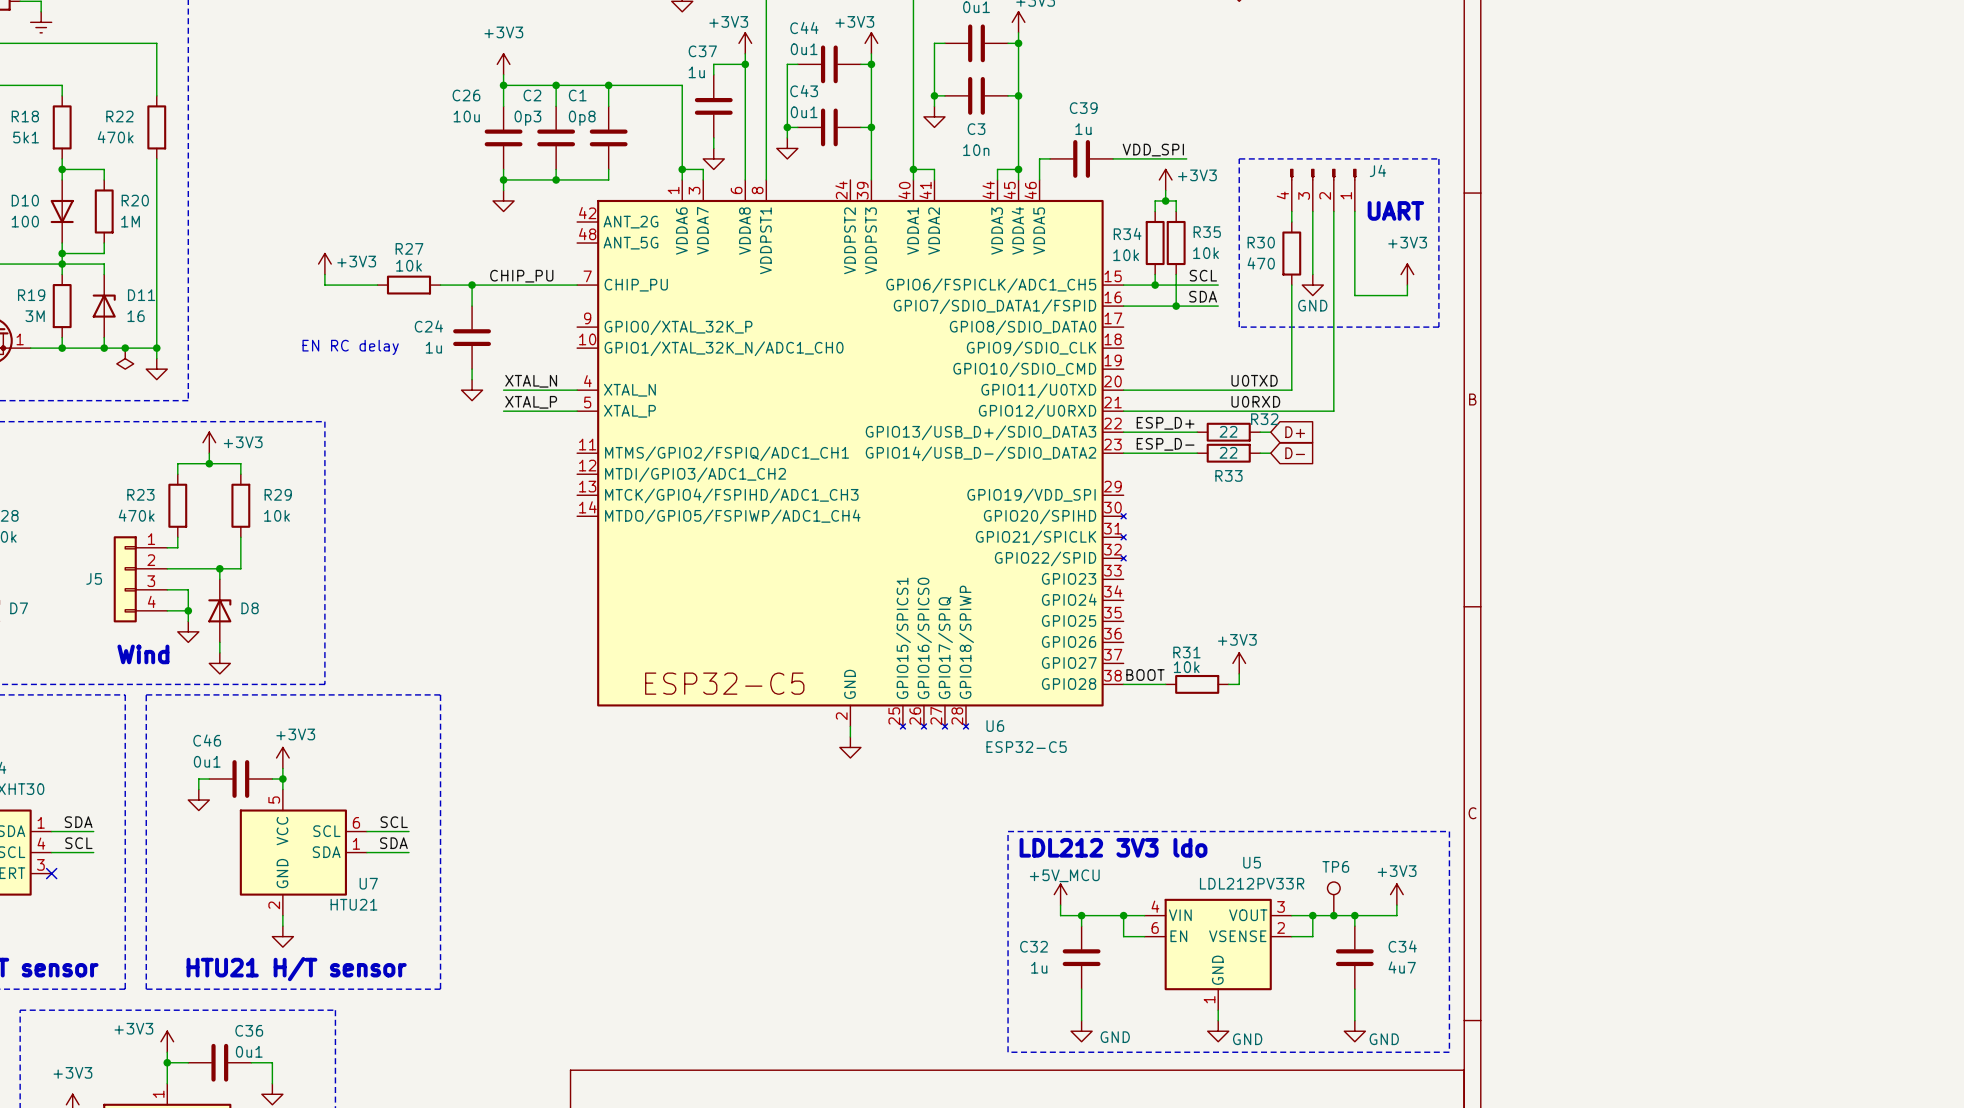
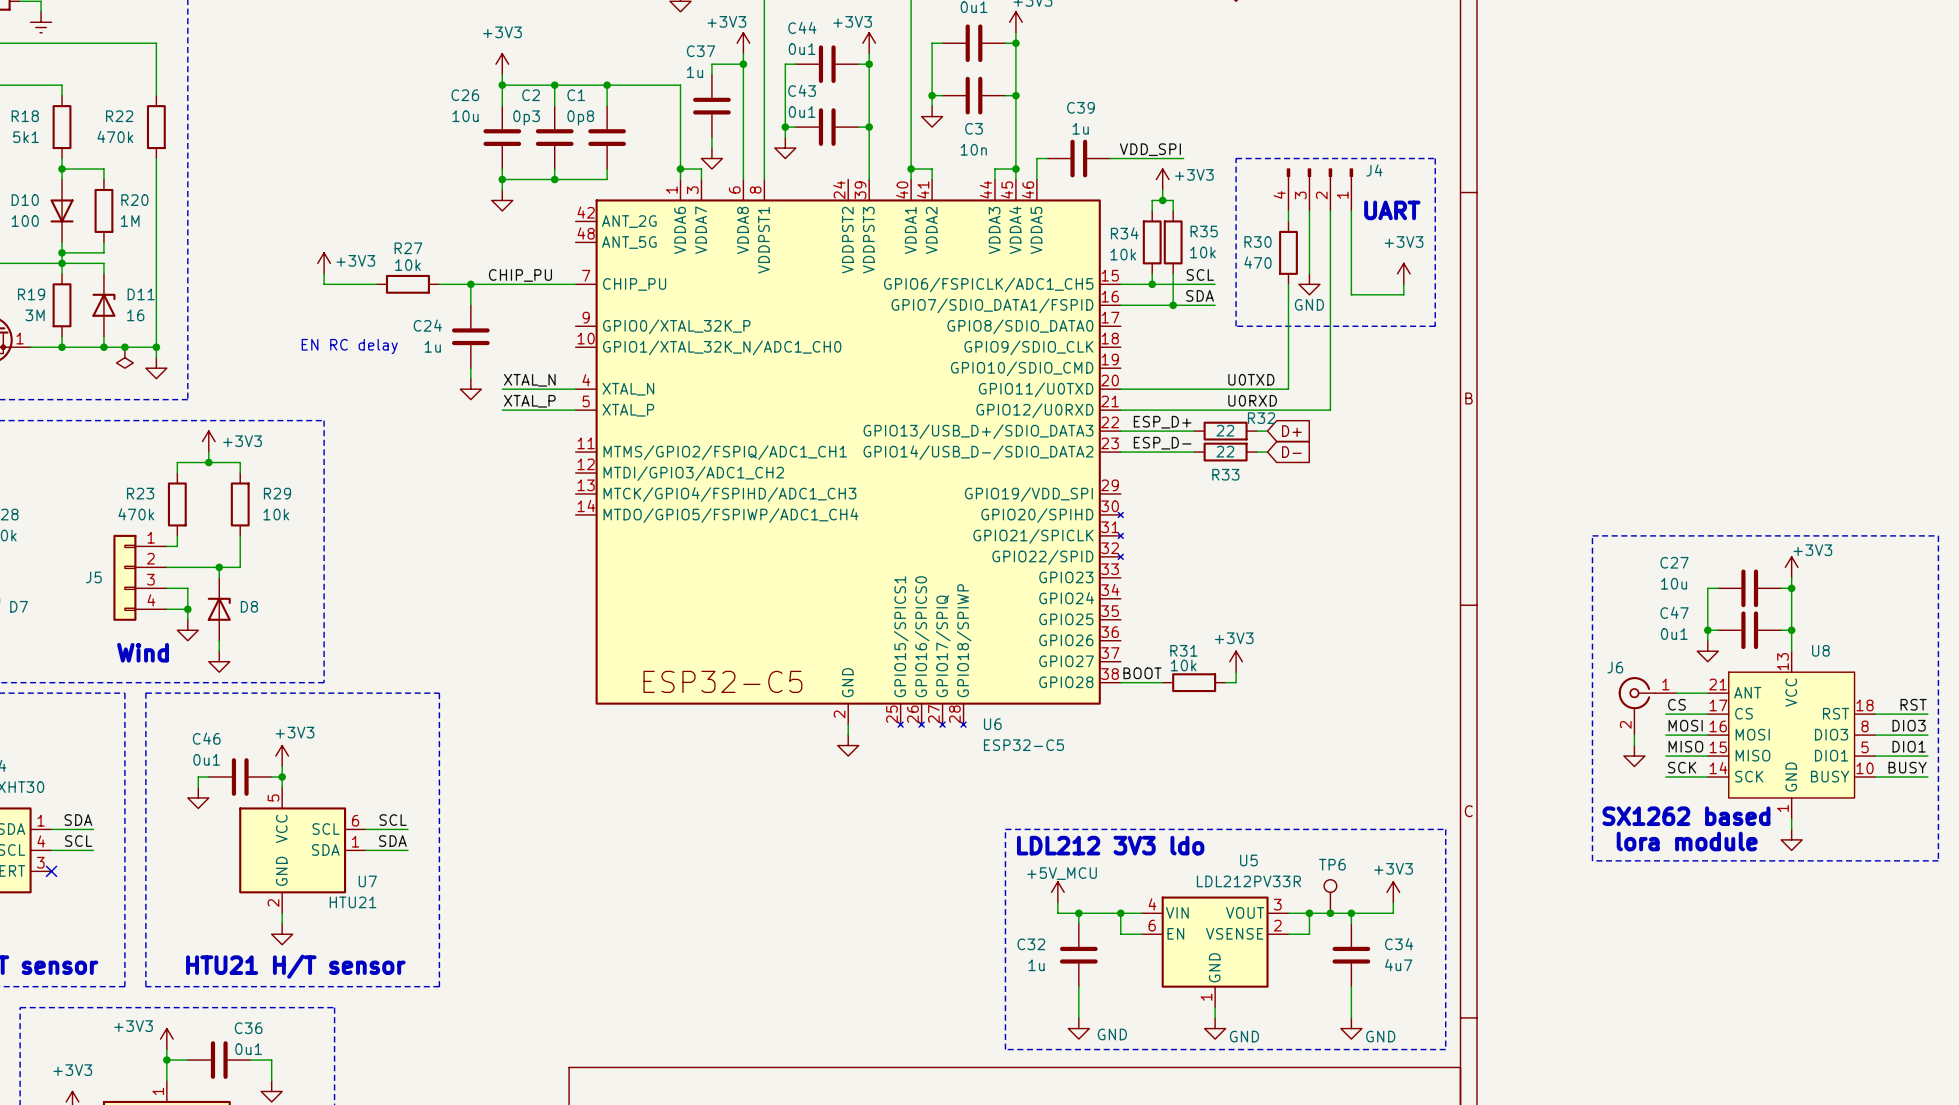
line: none -> (1592, 535) (1938, 535) (1938, 860) (1592, 860) (1592, 535)
power symbol: none -> +3V3 (1791, 567)
wire: none -> (1791, 577) (1791, 651)
wire: none -> (1718, 588) (1707, 588) (1707, 640)
C27: none -> 10u (1749, 588)
wire: none -> (1781, 588) (1791, 588)
junction: none -> (1791, 588)
wire: none -> (1707, 630) (1718, 630)
junction: none -> (1707, 630)
C47: none -> 0u1 (1749, 630)
wire: none -> (1781, 630) (1791, 630)
junction: none -> (1791, 630)
power symbol: none -> (1707, 651)
wire: none -> (1676, 693) (1707, 693)
label: none -> CS (1676, 704)
label: none -> RST (1913, 704)
J6: none -> (1647, 706)
wire: none -> (1665, 714) (1707, 714)
wire: none -> (1875, 714) (1927, 714)
label: none -> MOSI (1685, 725)
label: none -> DIO3 (1909, 725)
wire: none -> (1634, 735) (1634, 745)
wire: none -> (1665, 735) (1707, 735)
U8: none -> (1791, 735)
wire: none -> (1875, 735) (1927, 735)
label: none -> MISO (1685, 746)
label: none -> DIO1 (1909, 746)
power symbol: none -> (1634, 756)
wire: none -> (1665, 756) (1707, 756)
wire: none -> (1875, 756) (1927, 756)
label: none -> SCK (1682, 767)
label: none -> BUSY (1907, 767)
wire: none -> (1665, 777) (1707, 777)
wire: none -> (1875, 777) (1927, 777)
text: none -> SX1262 based (1686, 816)
wire: none -> (1791, 818) (1791, 829)
power symbol: none -> (1791, 839)
text: none -> lora module (1687, 841)

